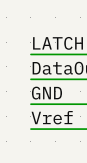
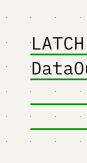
label: GND (46, 93) -> none
label: Vref (52, 117) -> none

